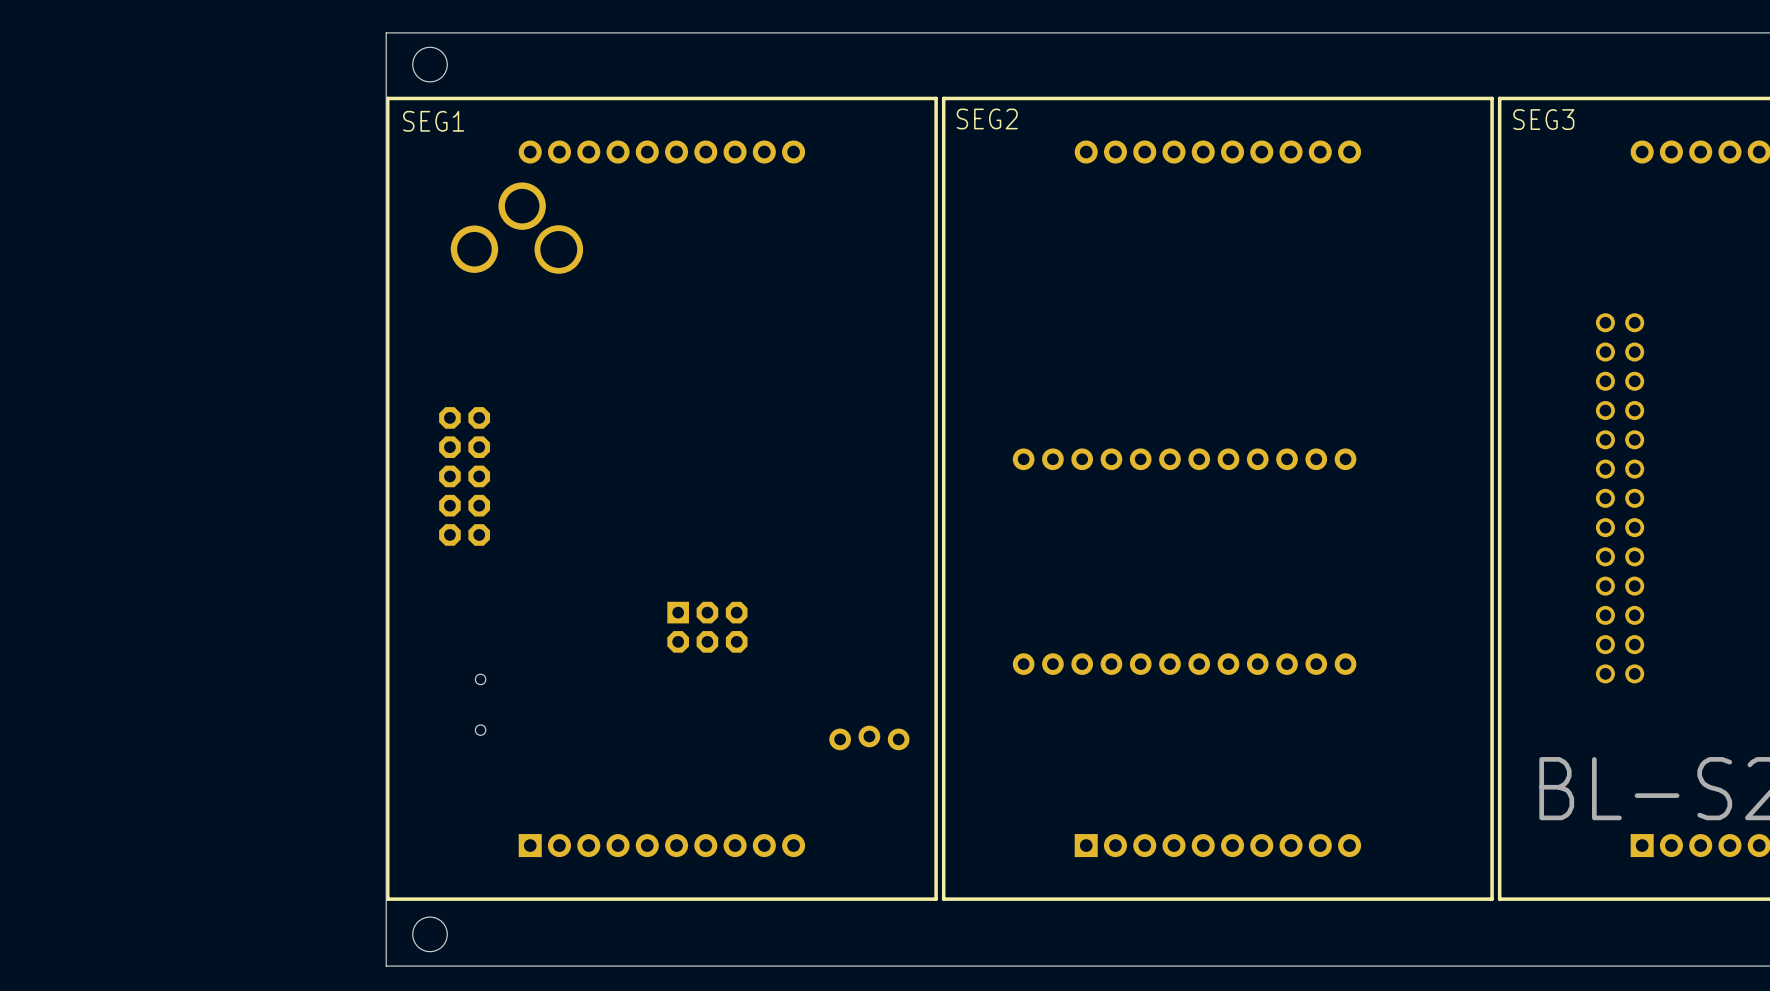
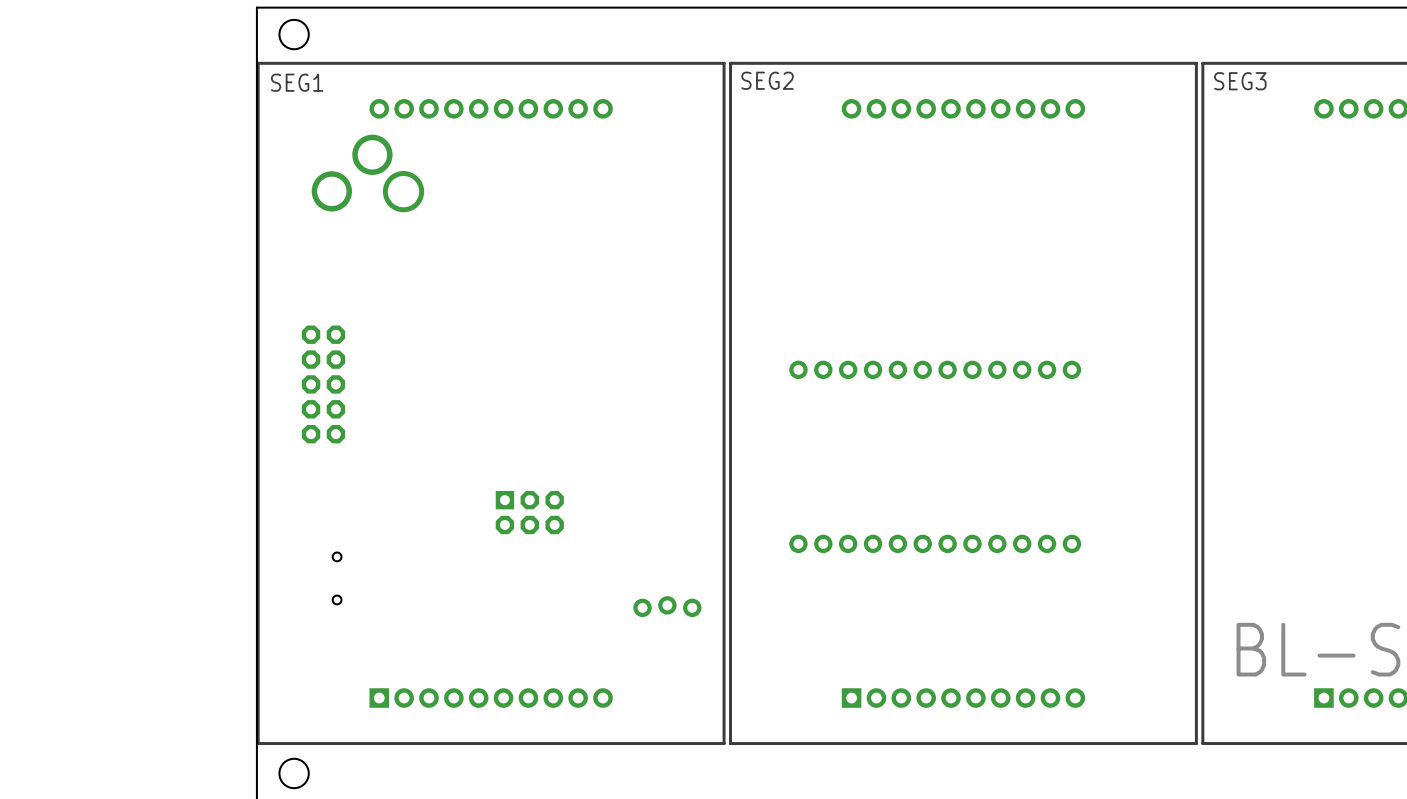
part: (1620, 498) -> none

